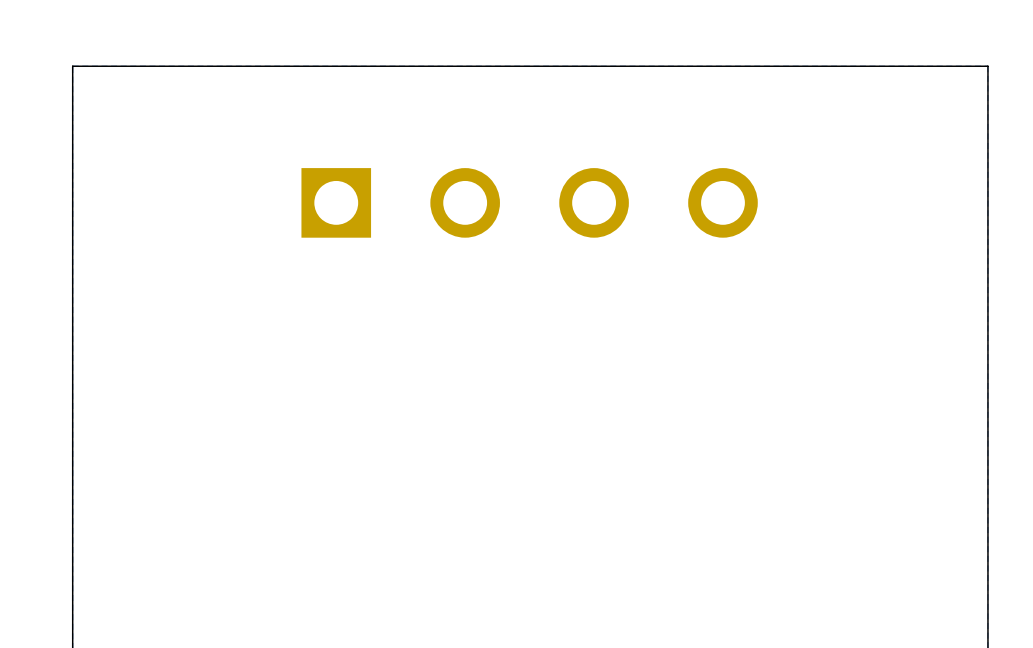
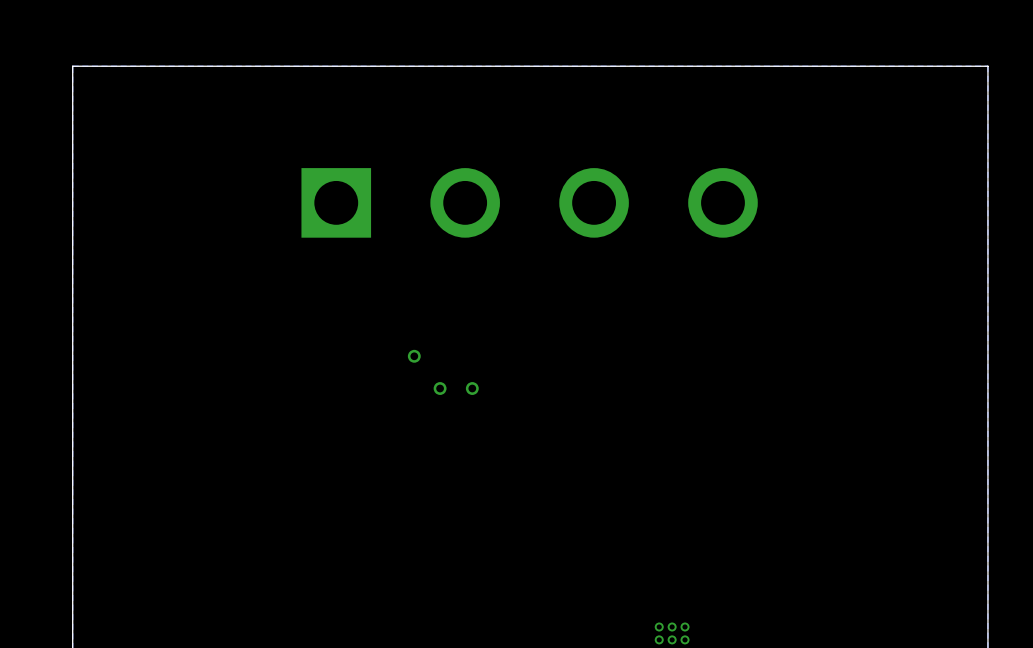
via: none -> (414, 356)
via: none -> (440, 388)
via: none -> (472, 388)
via: none -> (659, 627)
via: none -> (672, 627)
via: none -> (685, 627)
via: none -> (659, 639)
via: none -> (672, 639)
via: none -> (685, 639)

